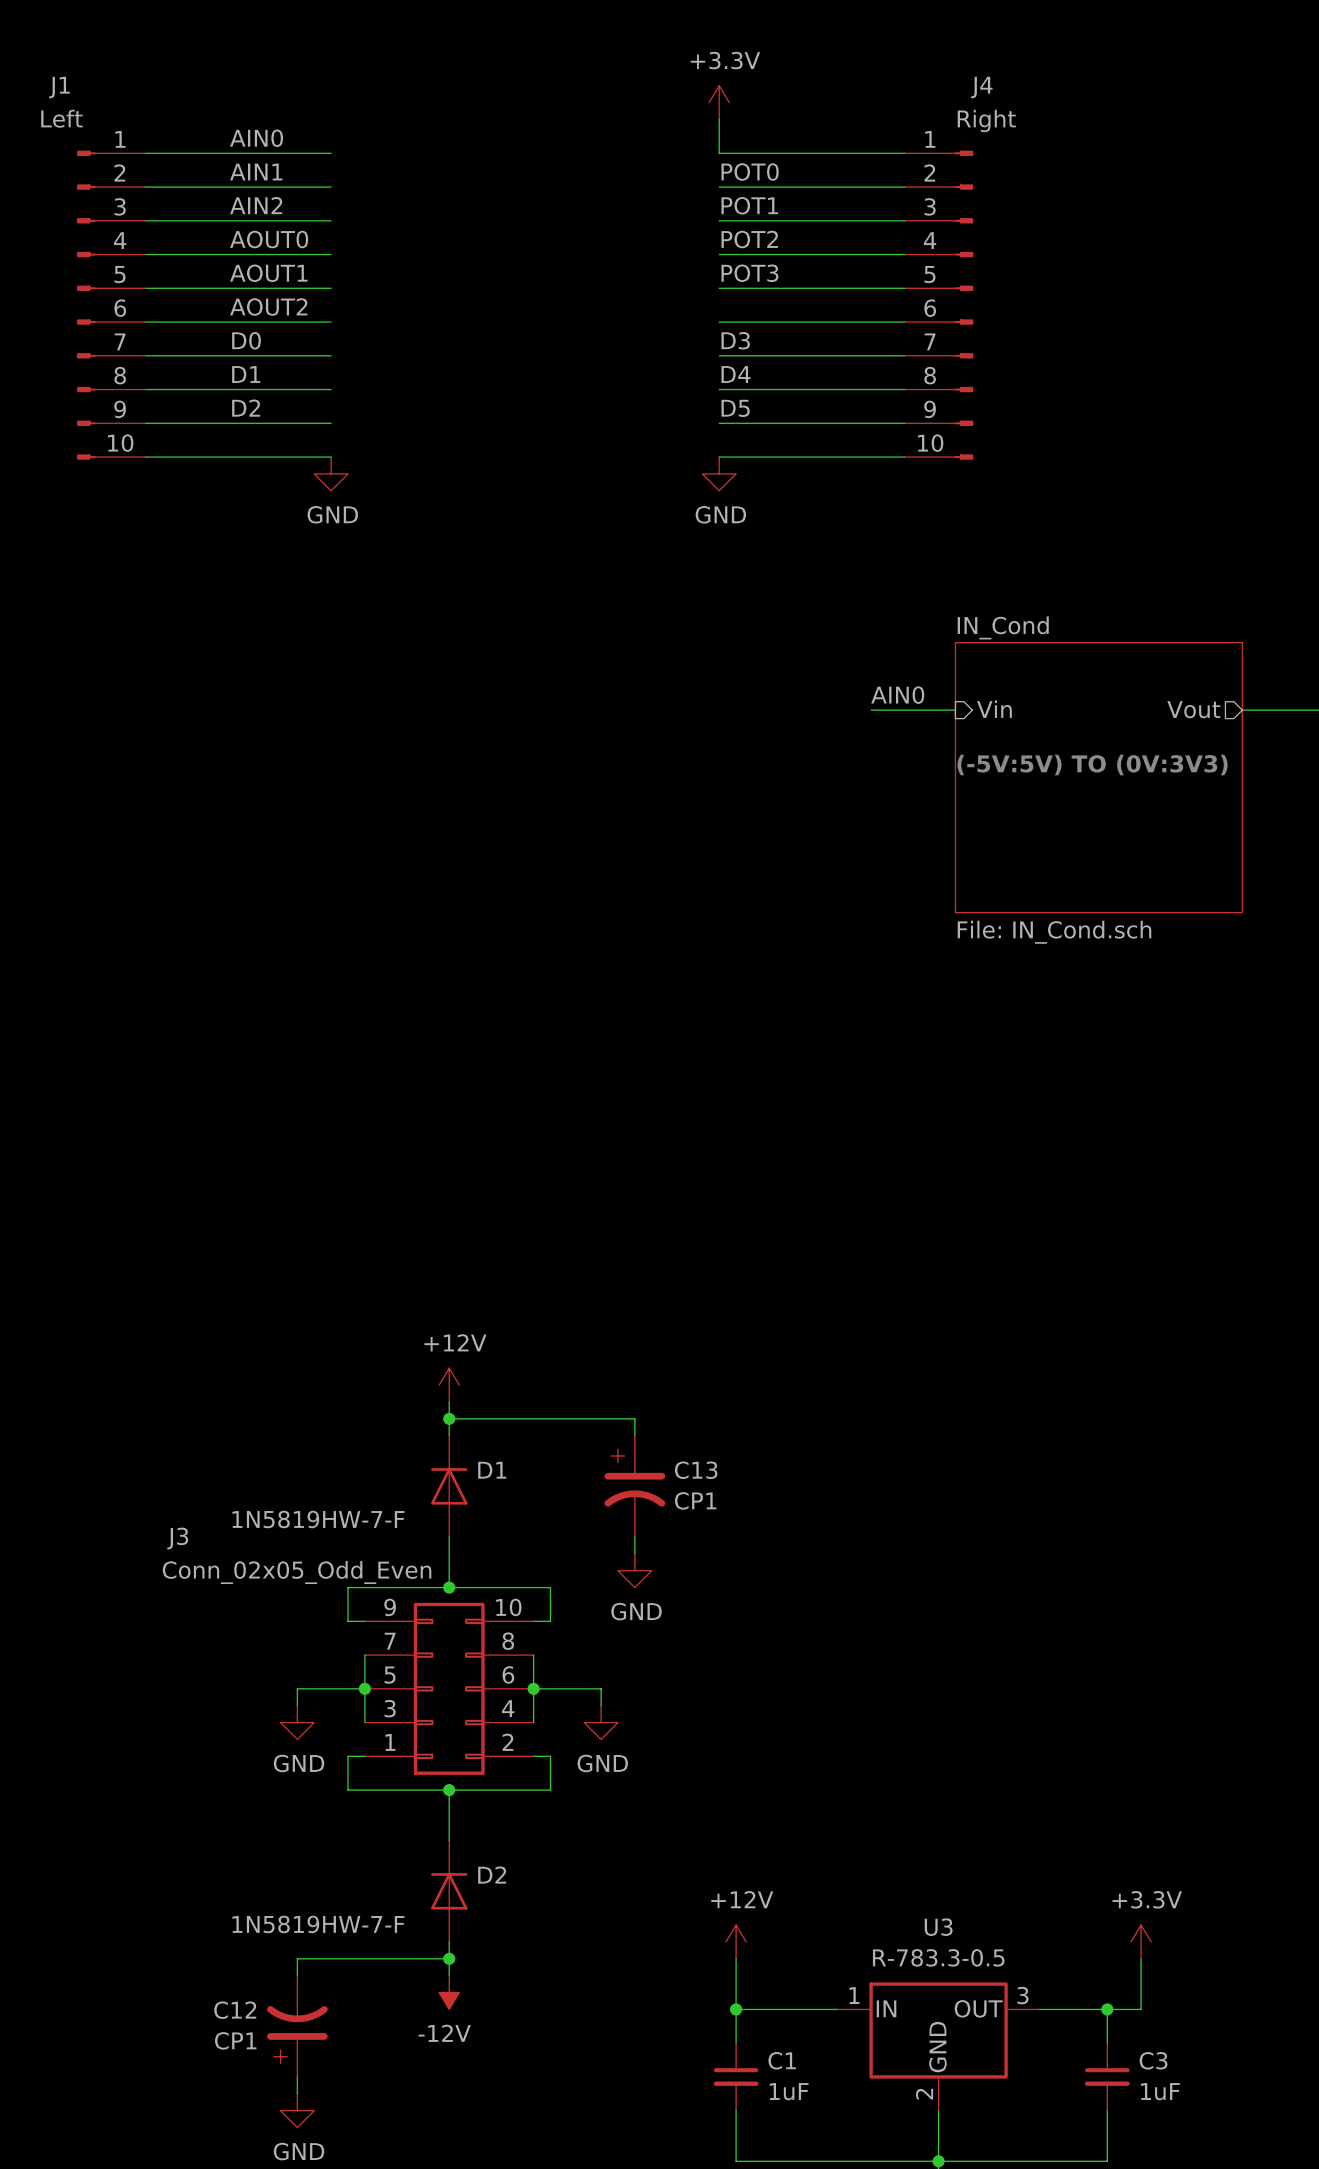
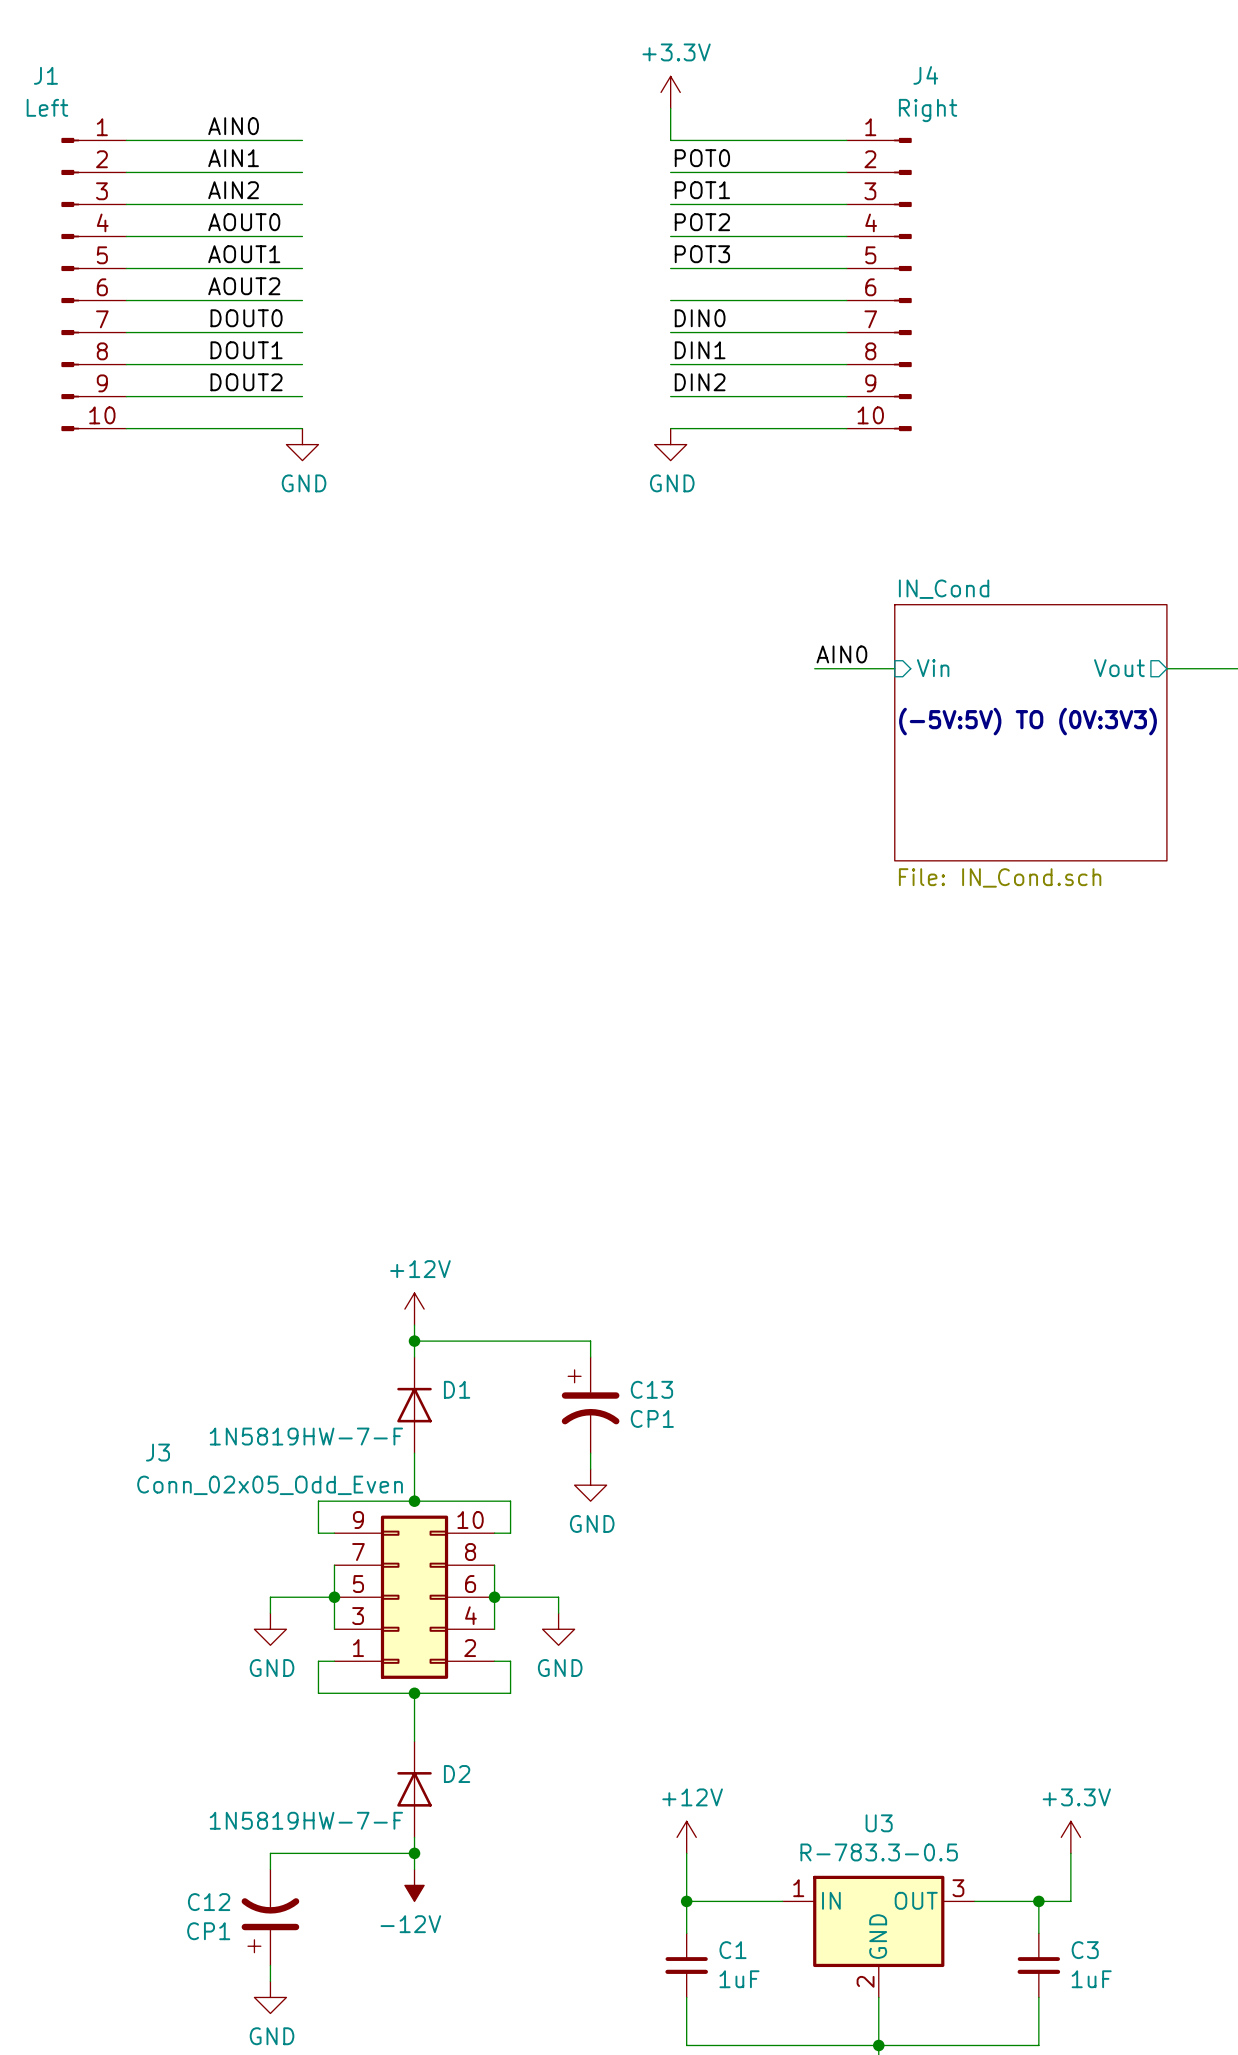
label: D0 (246, 340) -> DOUT0 (246, 318)
label: D3 (735, 340) -> DIN0 (700, 318)
label: D1 (246, 374) -> DOUT1 (246, 350)
label: D4 (735, 374) -> DIN1 (700, 350)
label: D2 (246, 408) -> DOUT2 (246, 382)
label: D5 (735, 408) -> DIN2 (700, 382)

